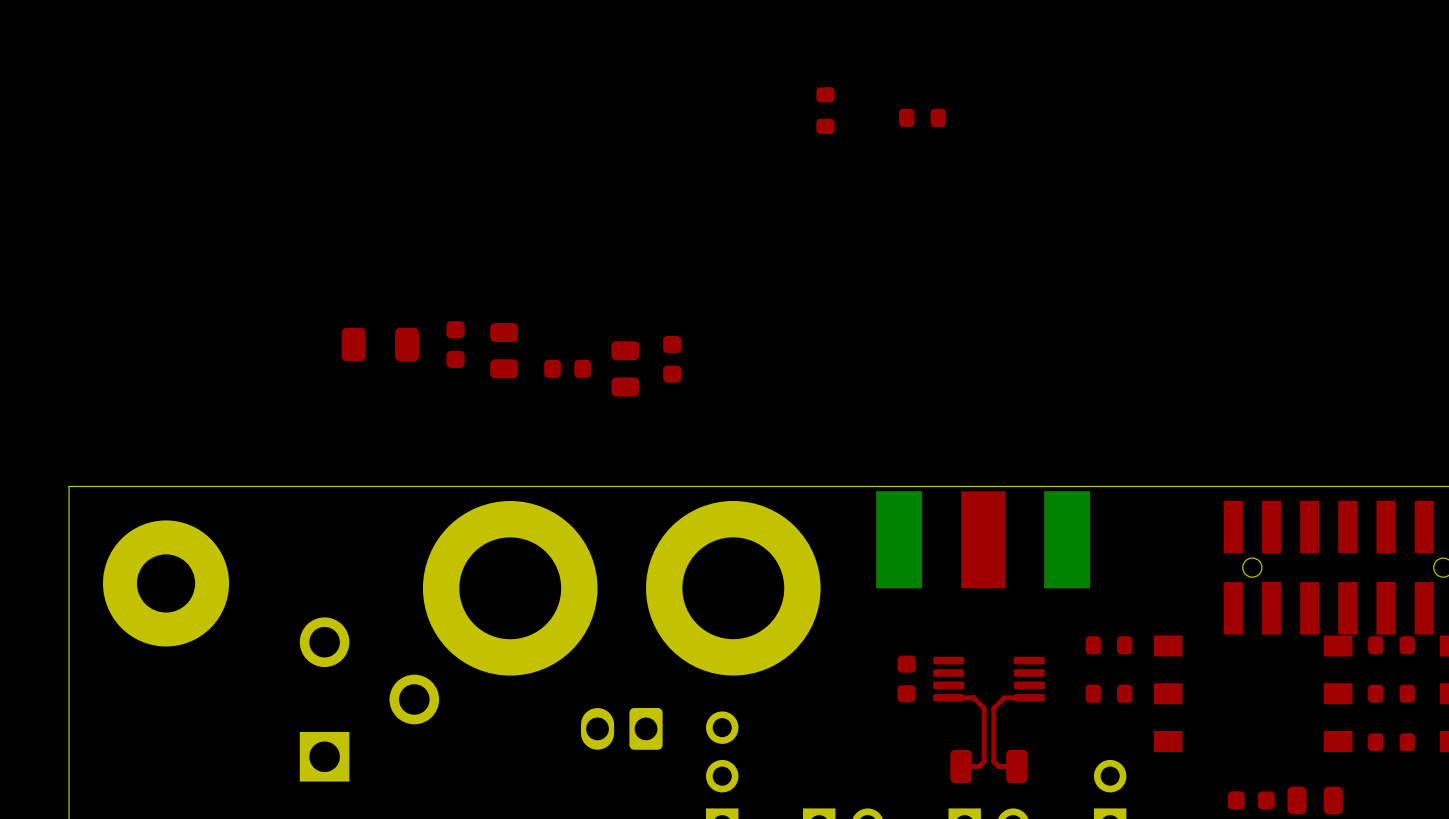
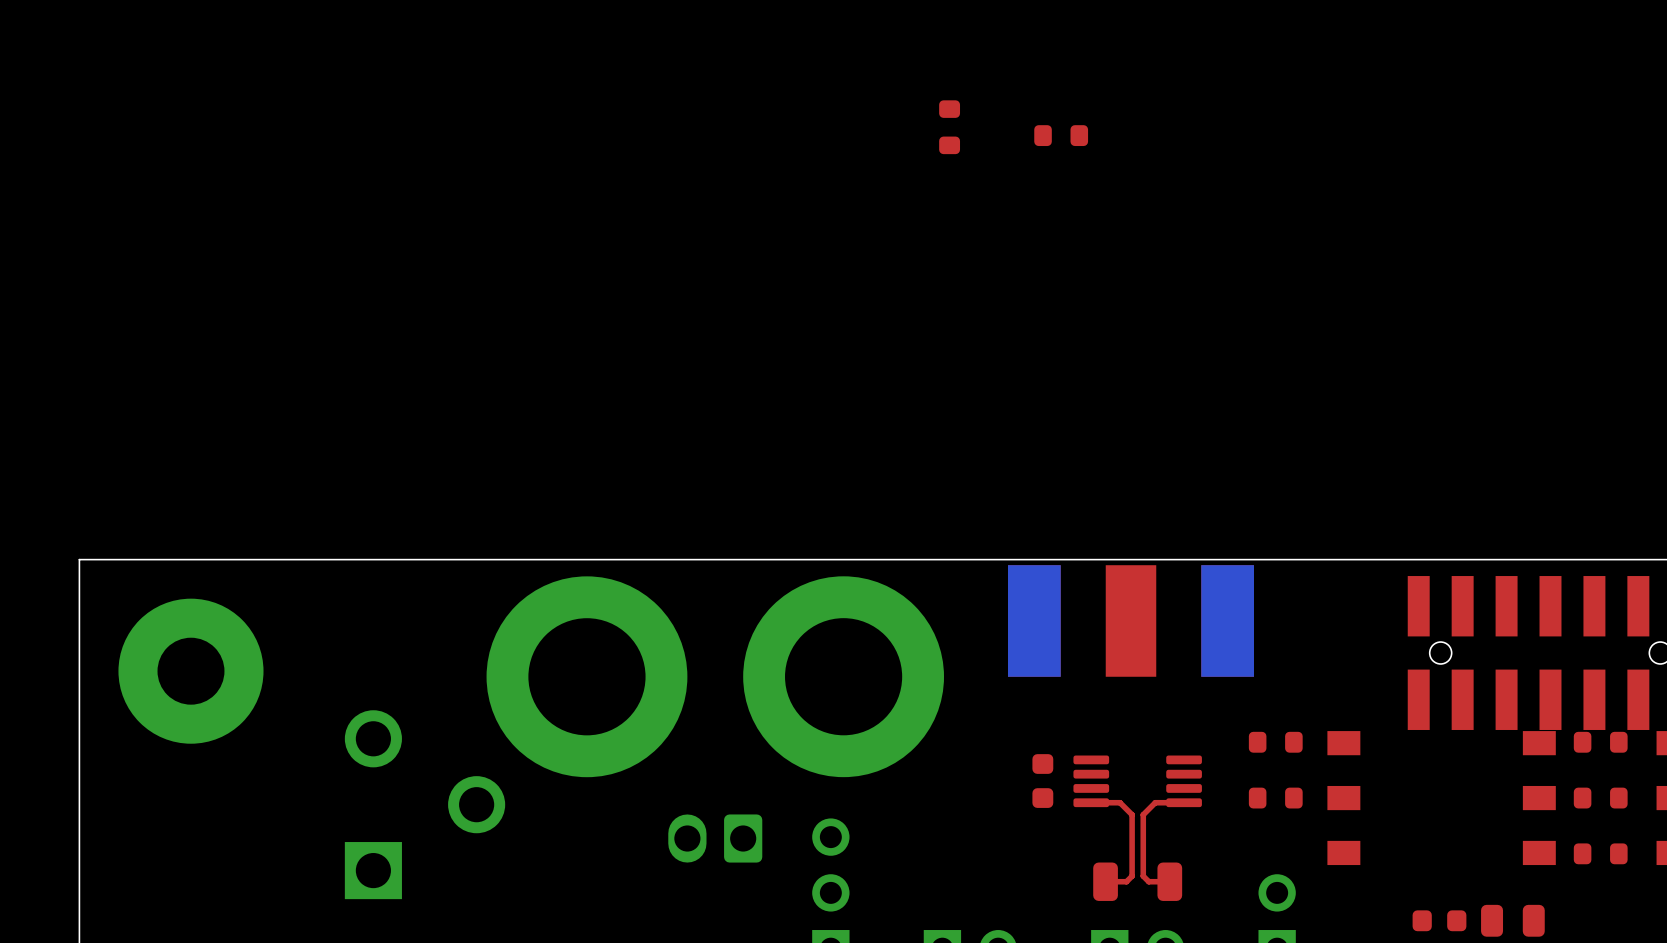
part: (380, 344) -> none
part: (455, 344) -> none
part: (504, 350) -> none
part: (672, 359) -> none
part: (567, 368) -> none
part: (625, 368) -> none

